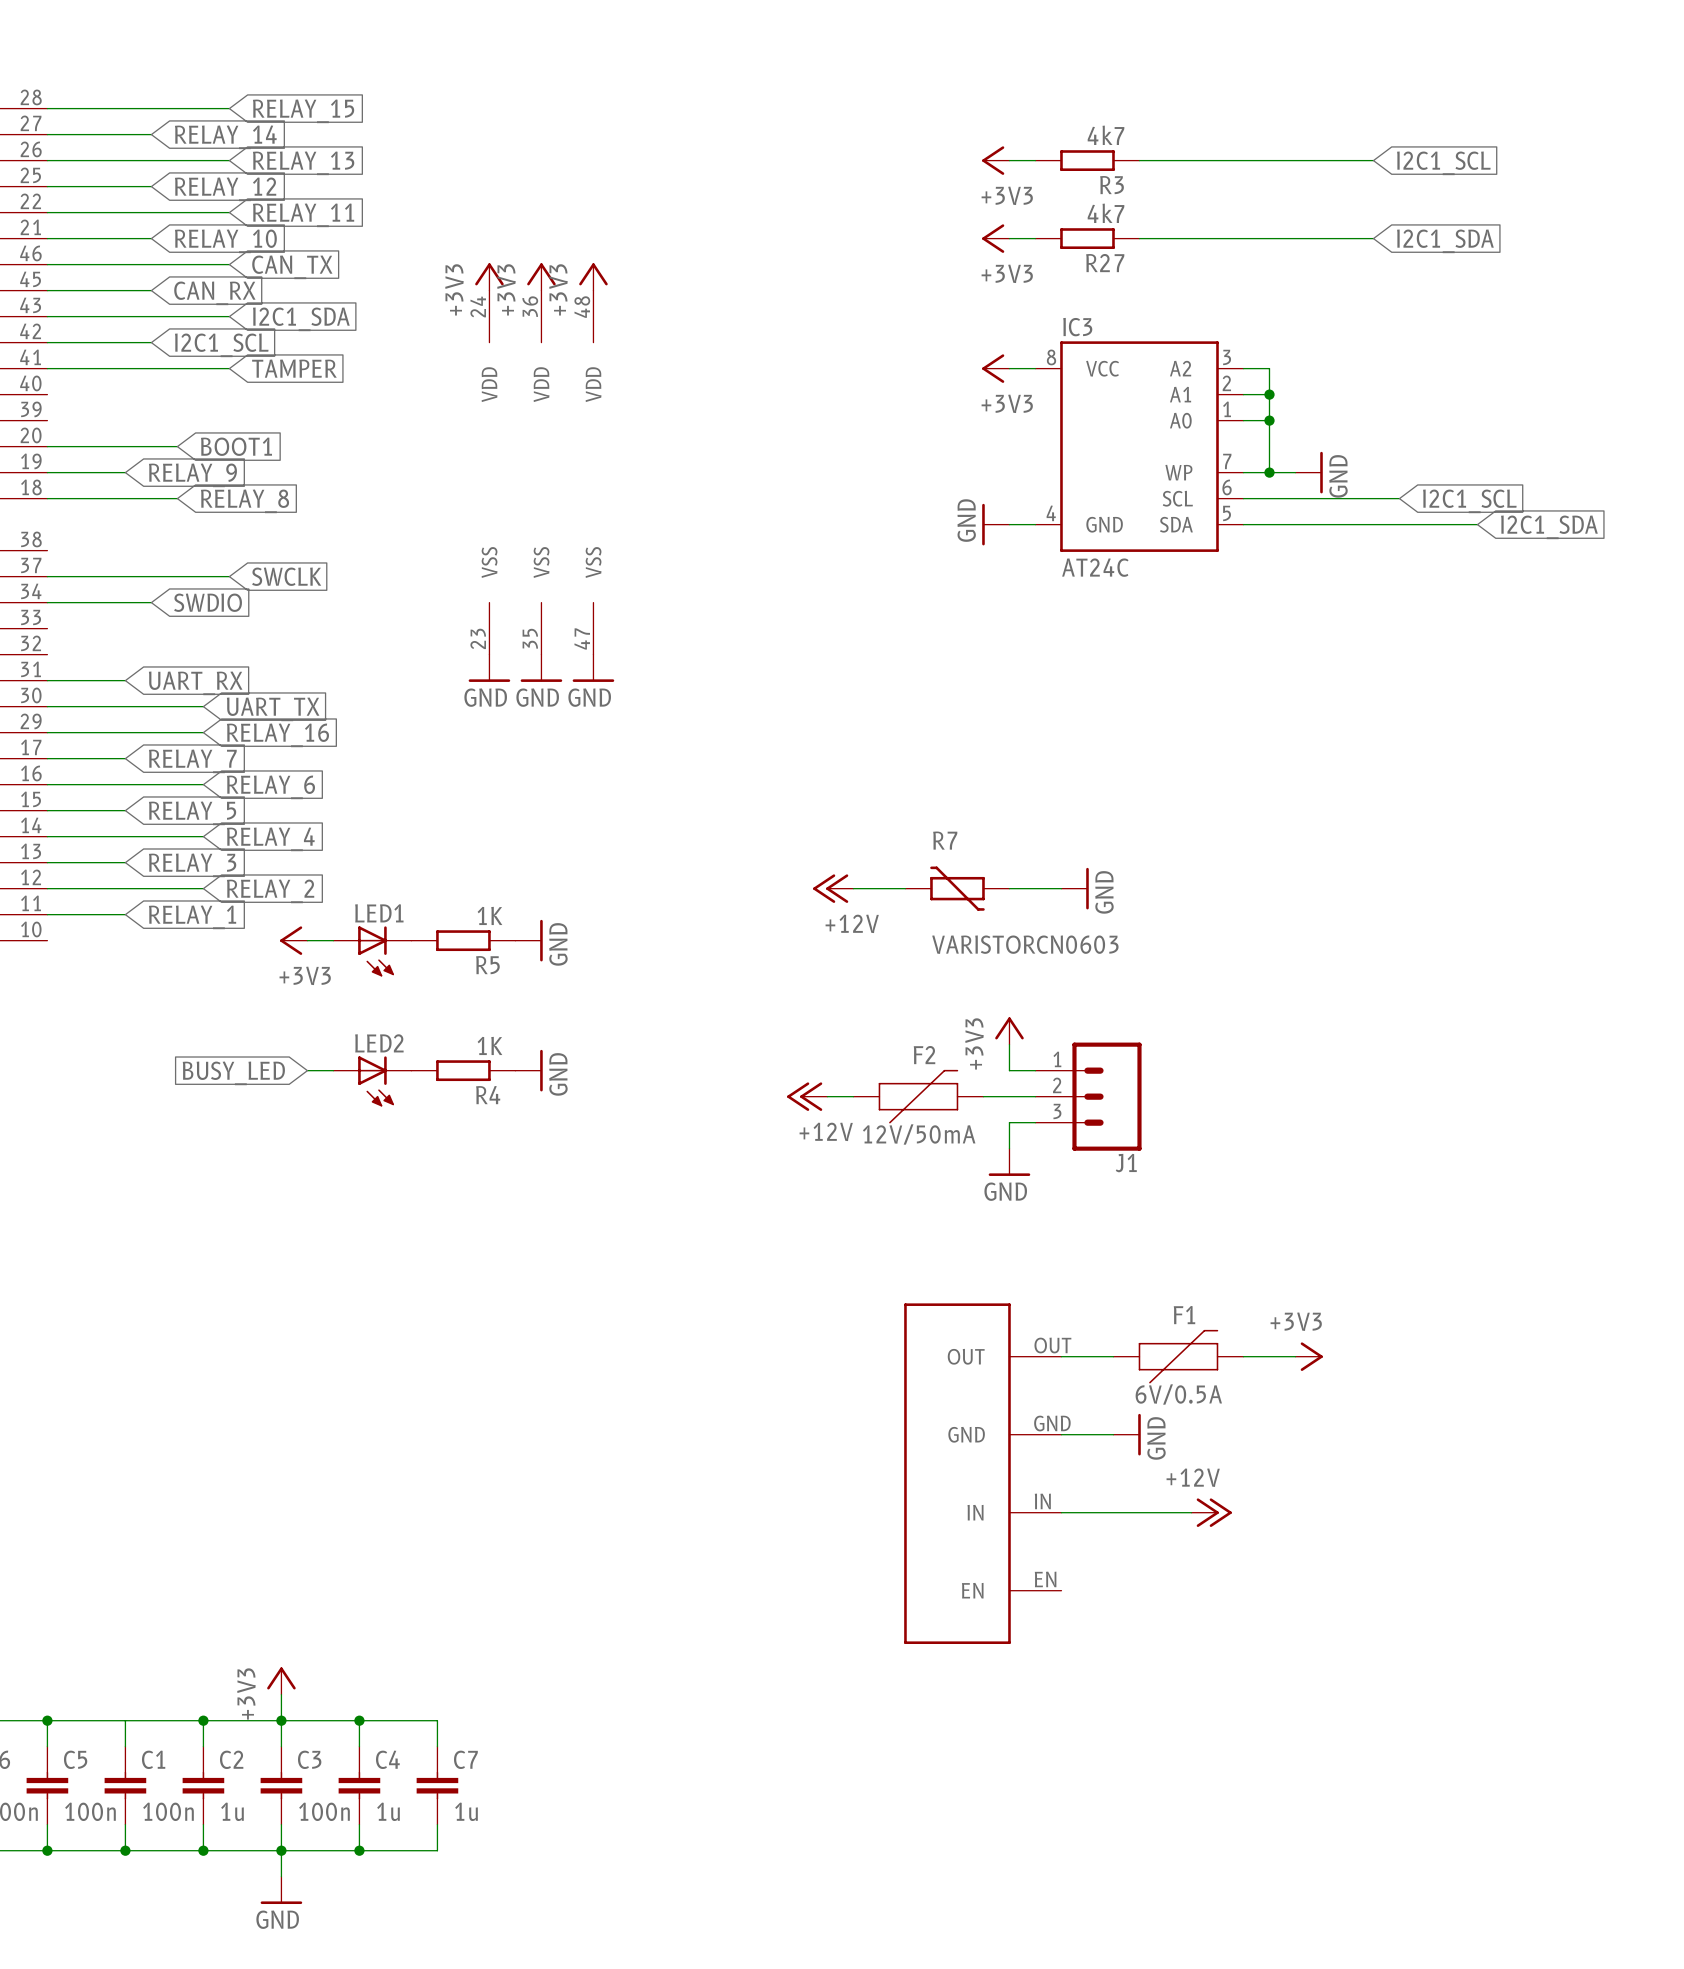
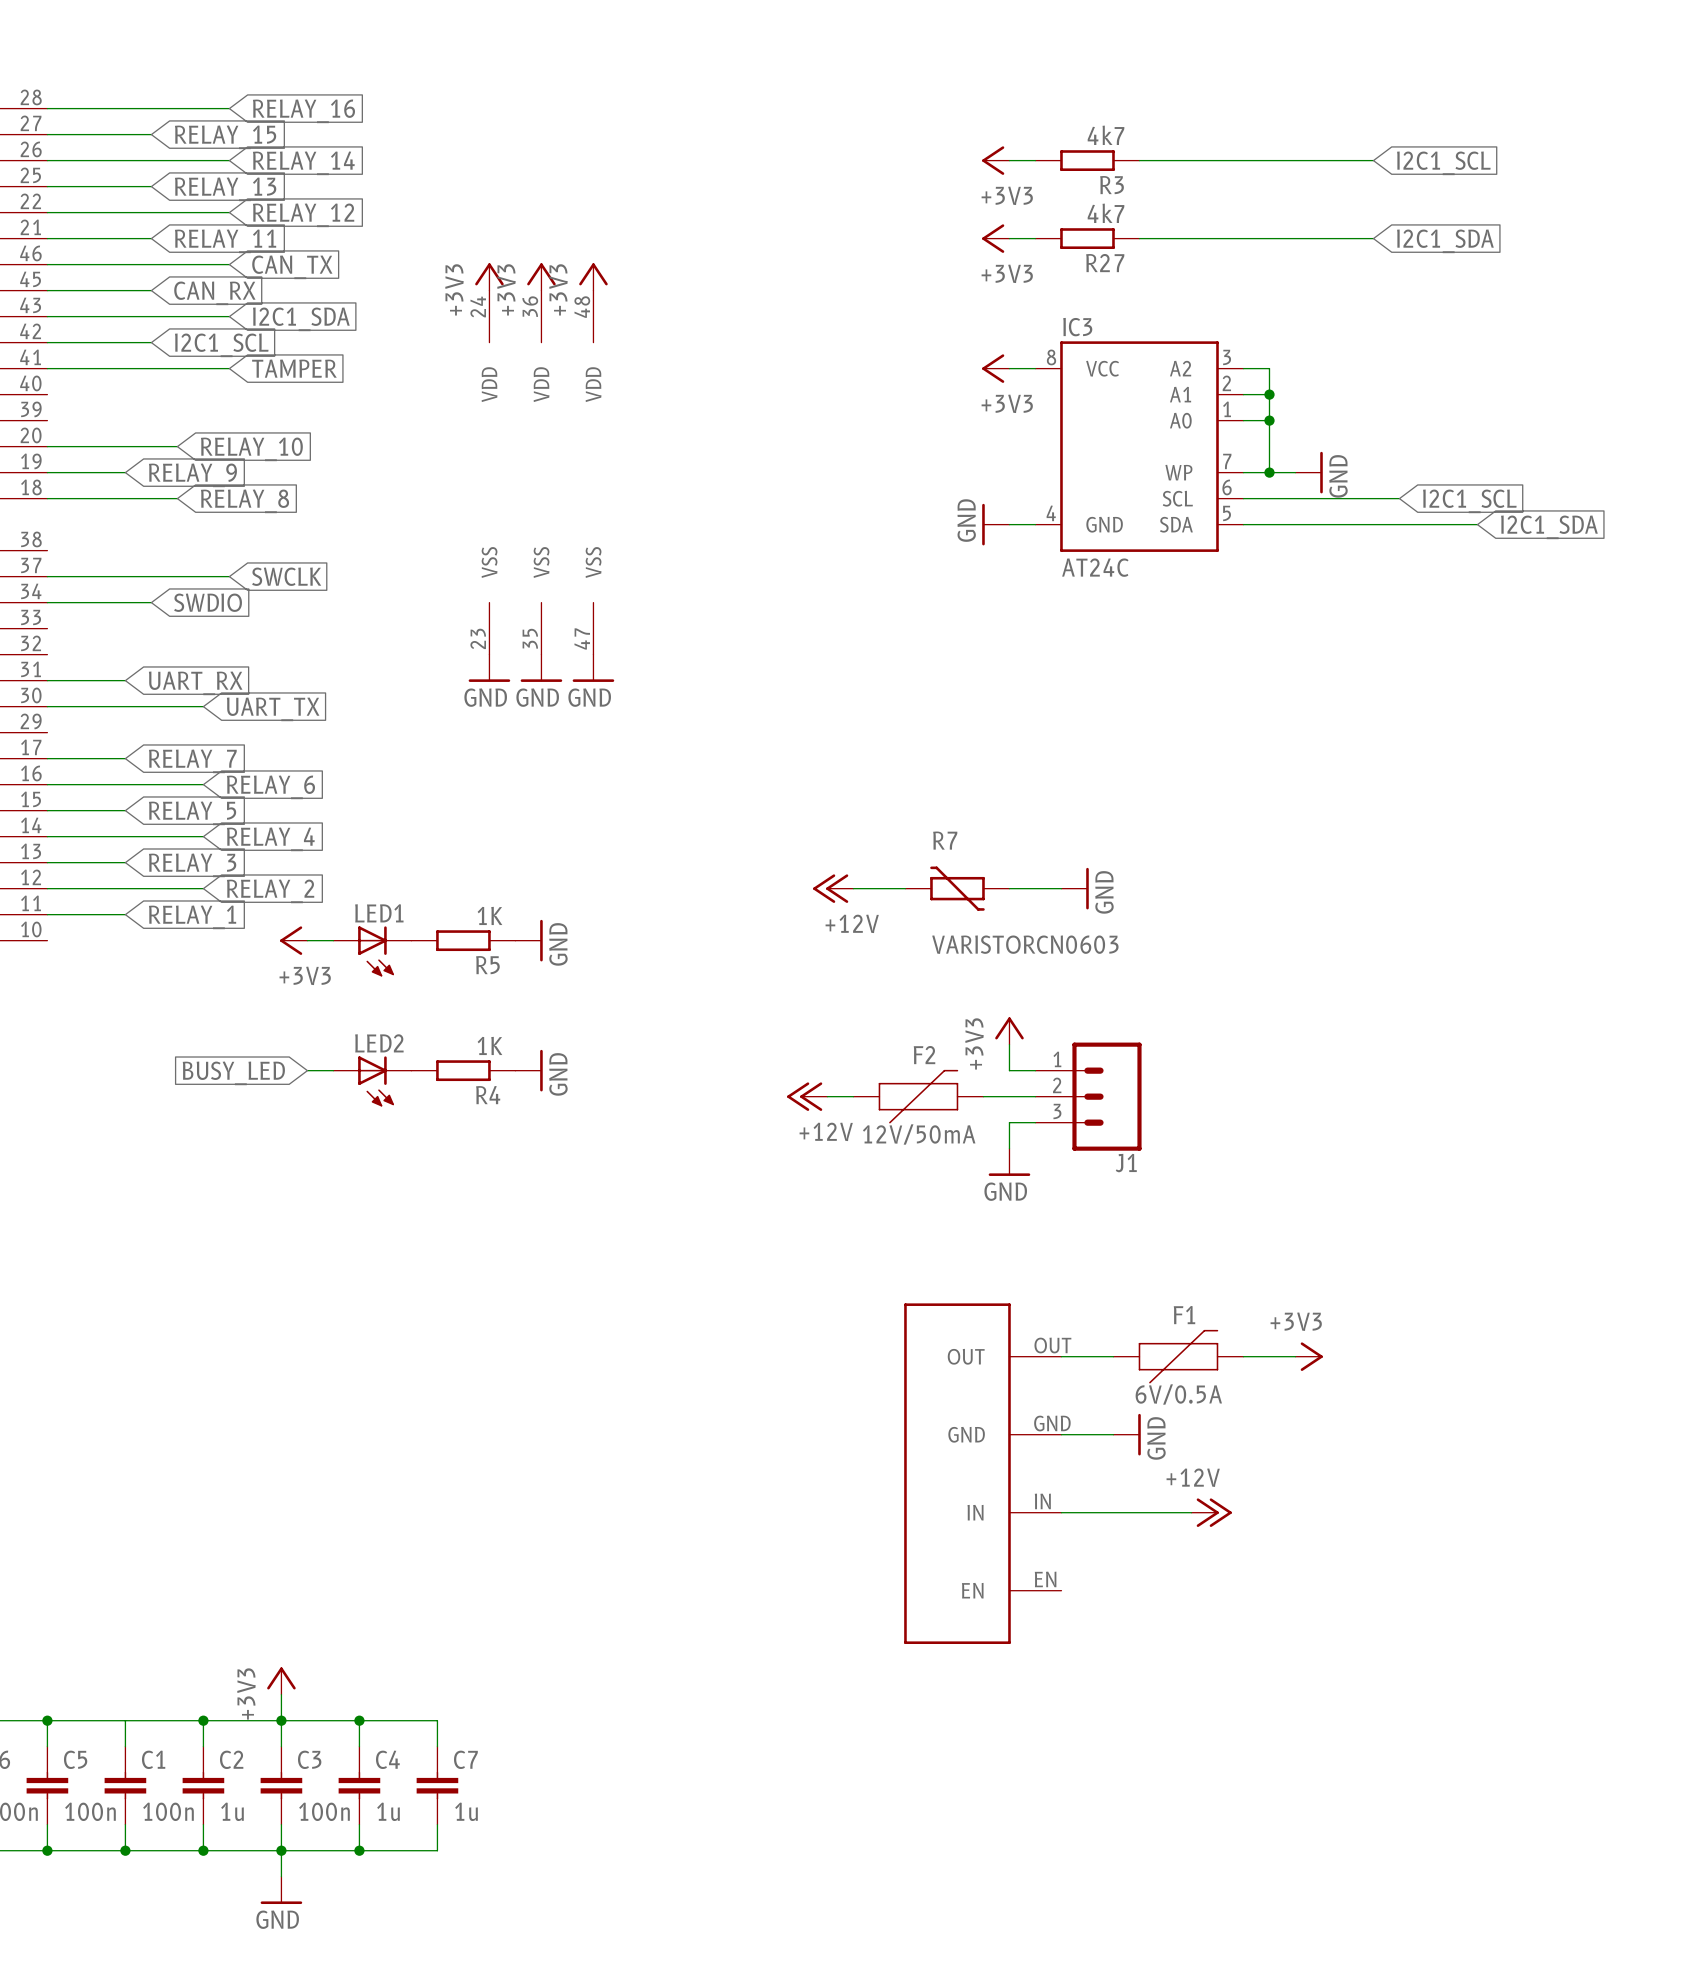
global label: RELAY_15 (303, 111) -> RELAY_16 (303, 111)
global label: RELAY_14 (225, 137) -> RELAY_15 (225, 137)
global label: RELAY_13 (303, 163) -> RELAY_14 (303, 163)
global label: RELAY_12 (225, 189) -> RELAY_13 (225, 189)
global label: RELAY_11 (303, 215) -> RELAY_12 (303, 215)
global label: RELAY_10 (225, 241) -> RELAY_11 (225, 241)
global label: BOOT1 (236, 446) -> RELAY_10 (251, 449)
wire: (47, 732) (203, 732) -> none
global label: RELAY_16 (277, 735) -> none

